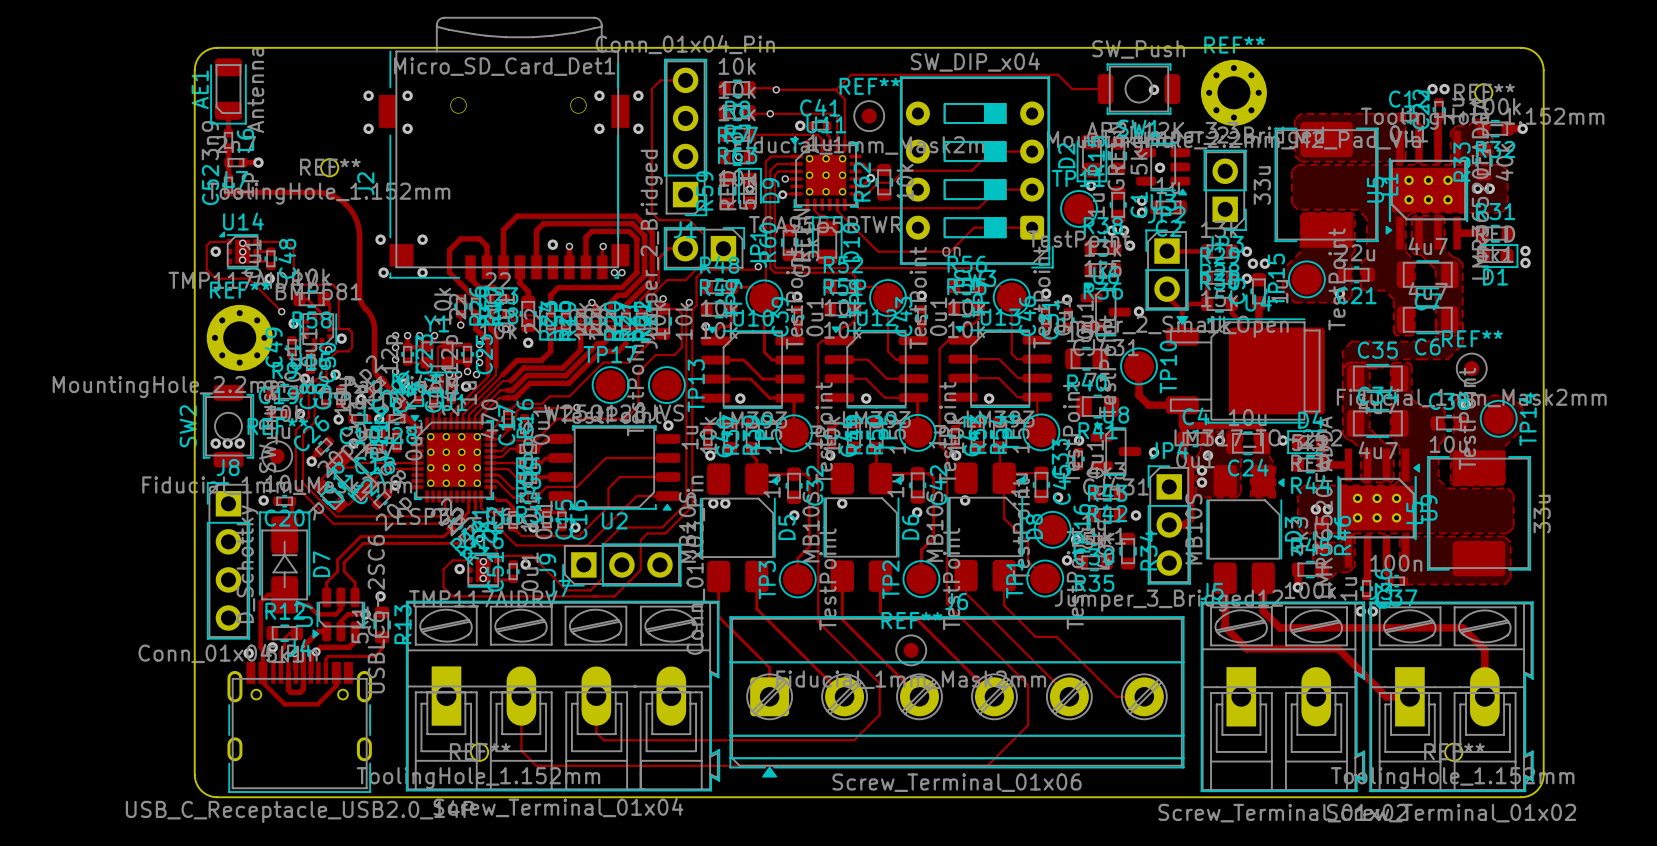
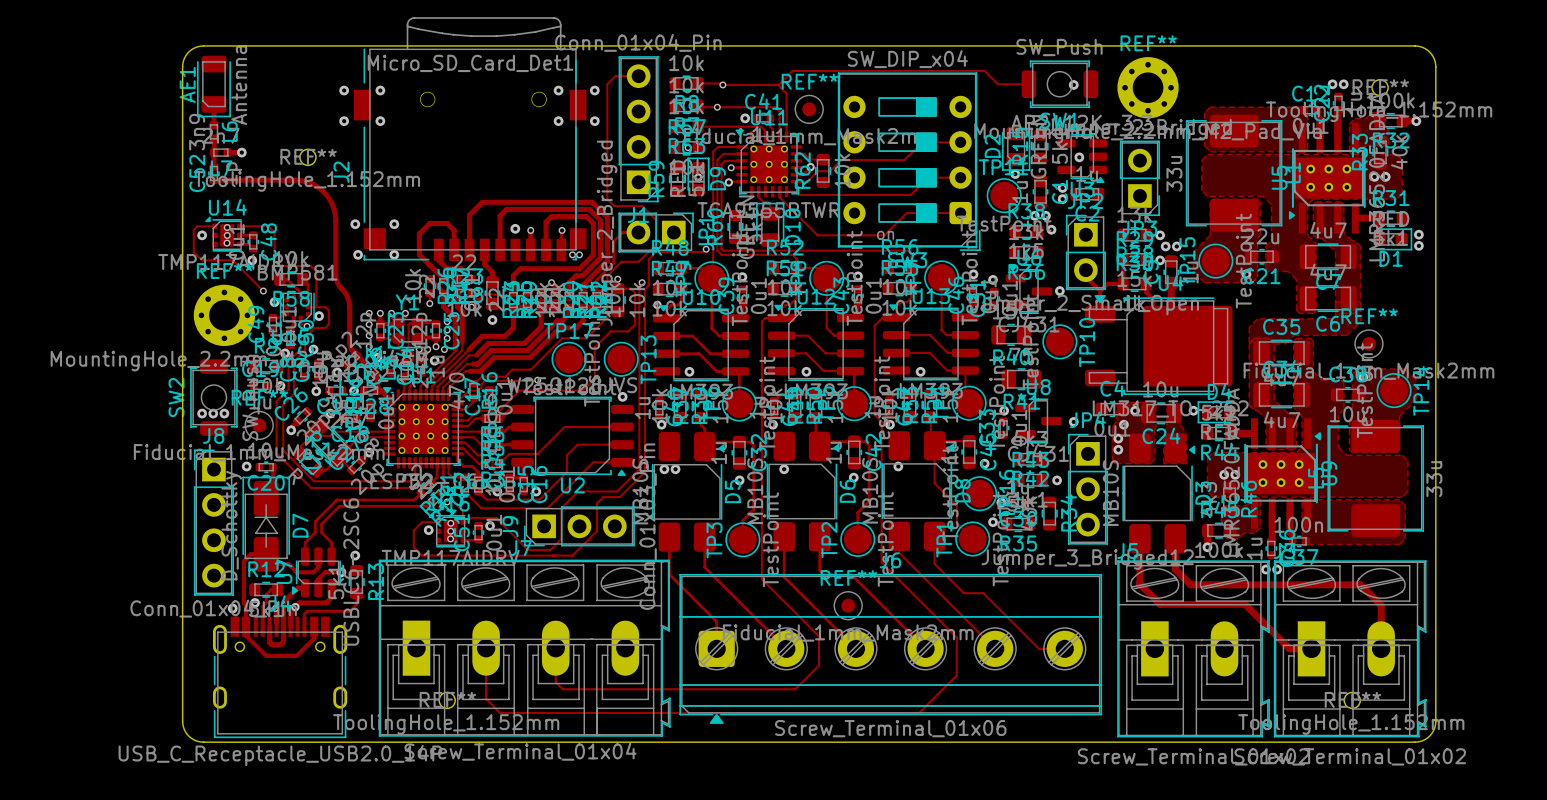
track: (1167, 251) (1207, 251) -> none
track: (1139, 366) (1139, 395) (1148, 405) (1182, 405) (1183, 427) -> none
track: (1183, 427) (1183, 453) (1190, 460) (1190, 519) (1184, 524) (1169, 524) -> none
track: (1183, 427) (1185, 425) (1255, 425) (1262, 431) (1262, 443) -> none

